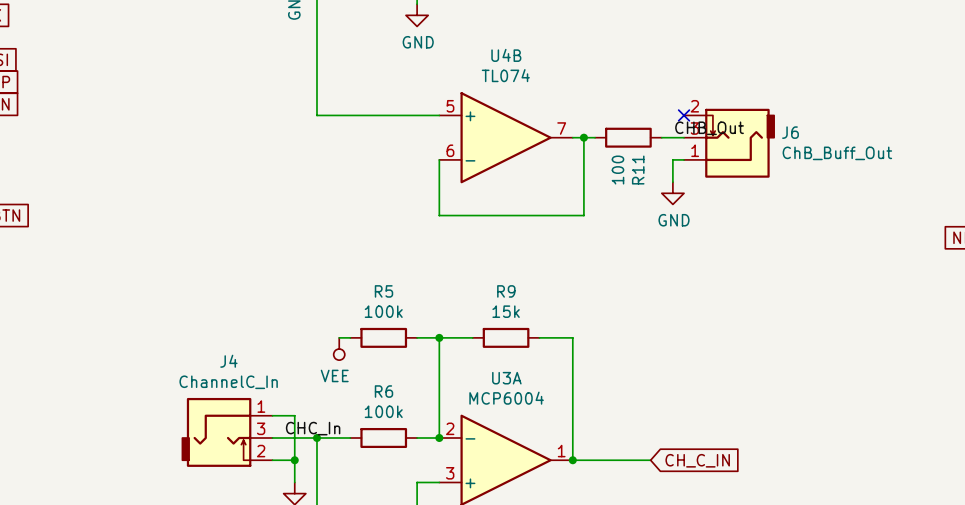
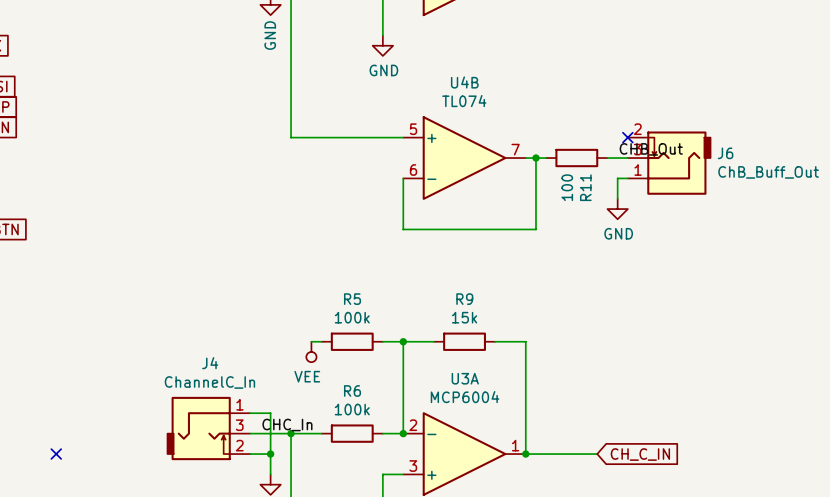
no-connect mark: none -> (56, 454)

